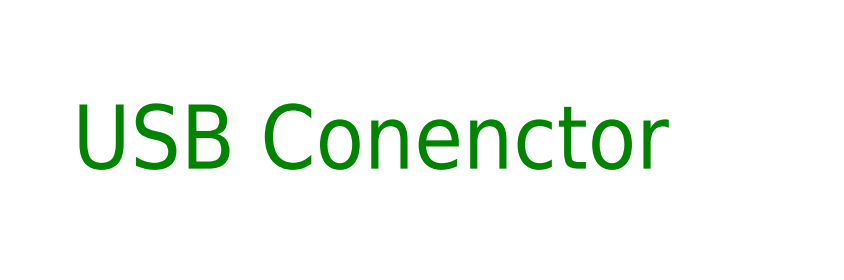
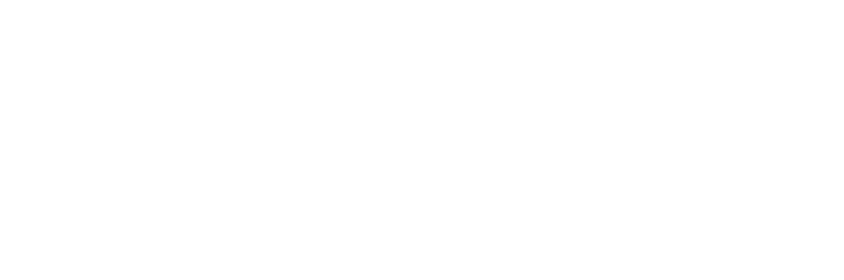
text: USB Conenctor (374, 136) -> none

